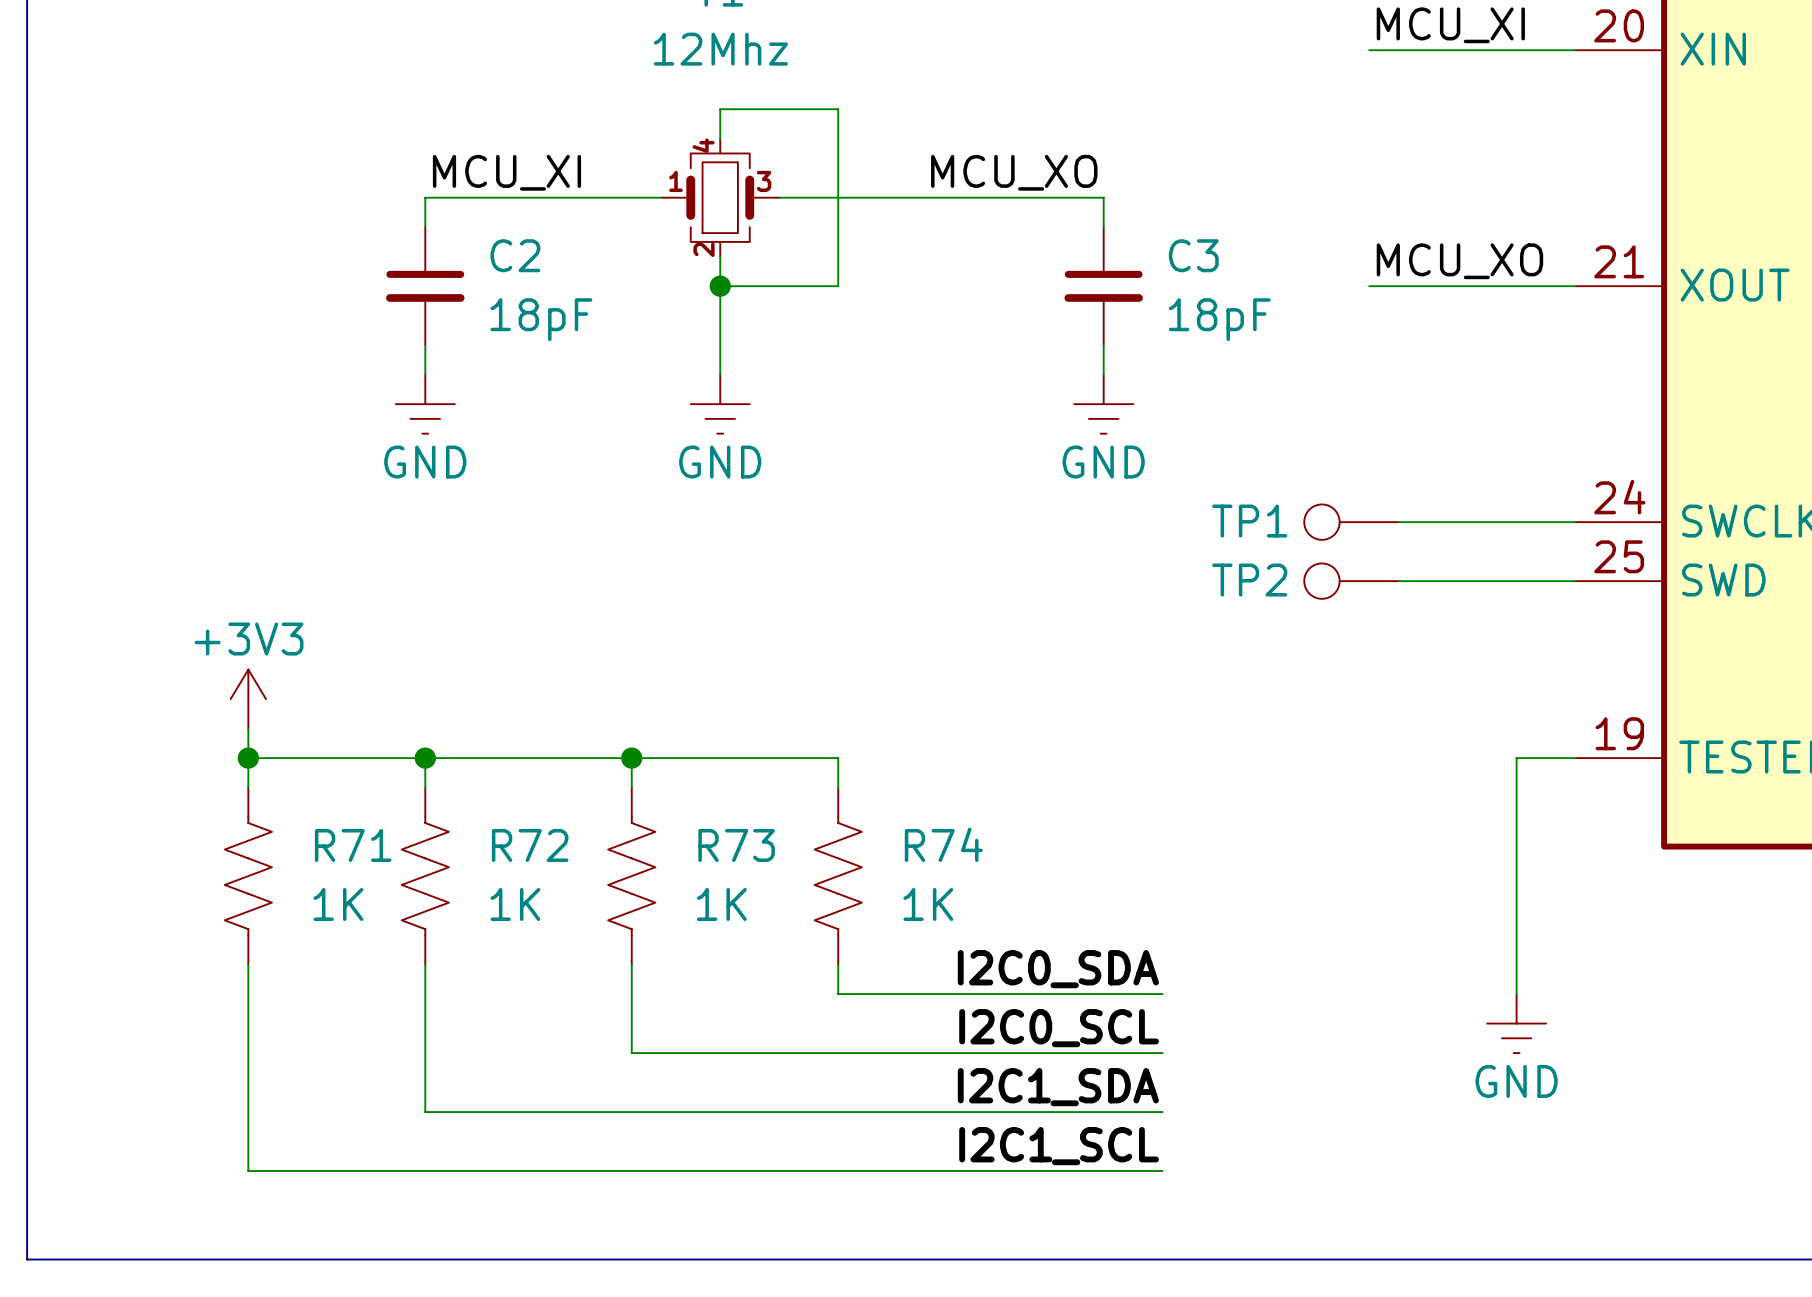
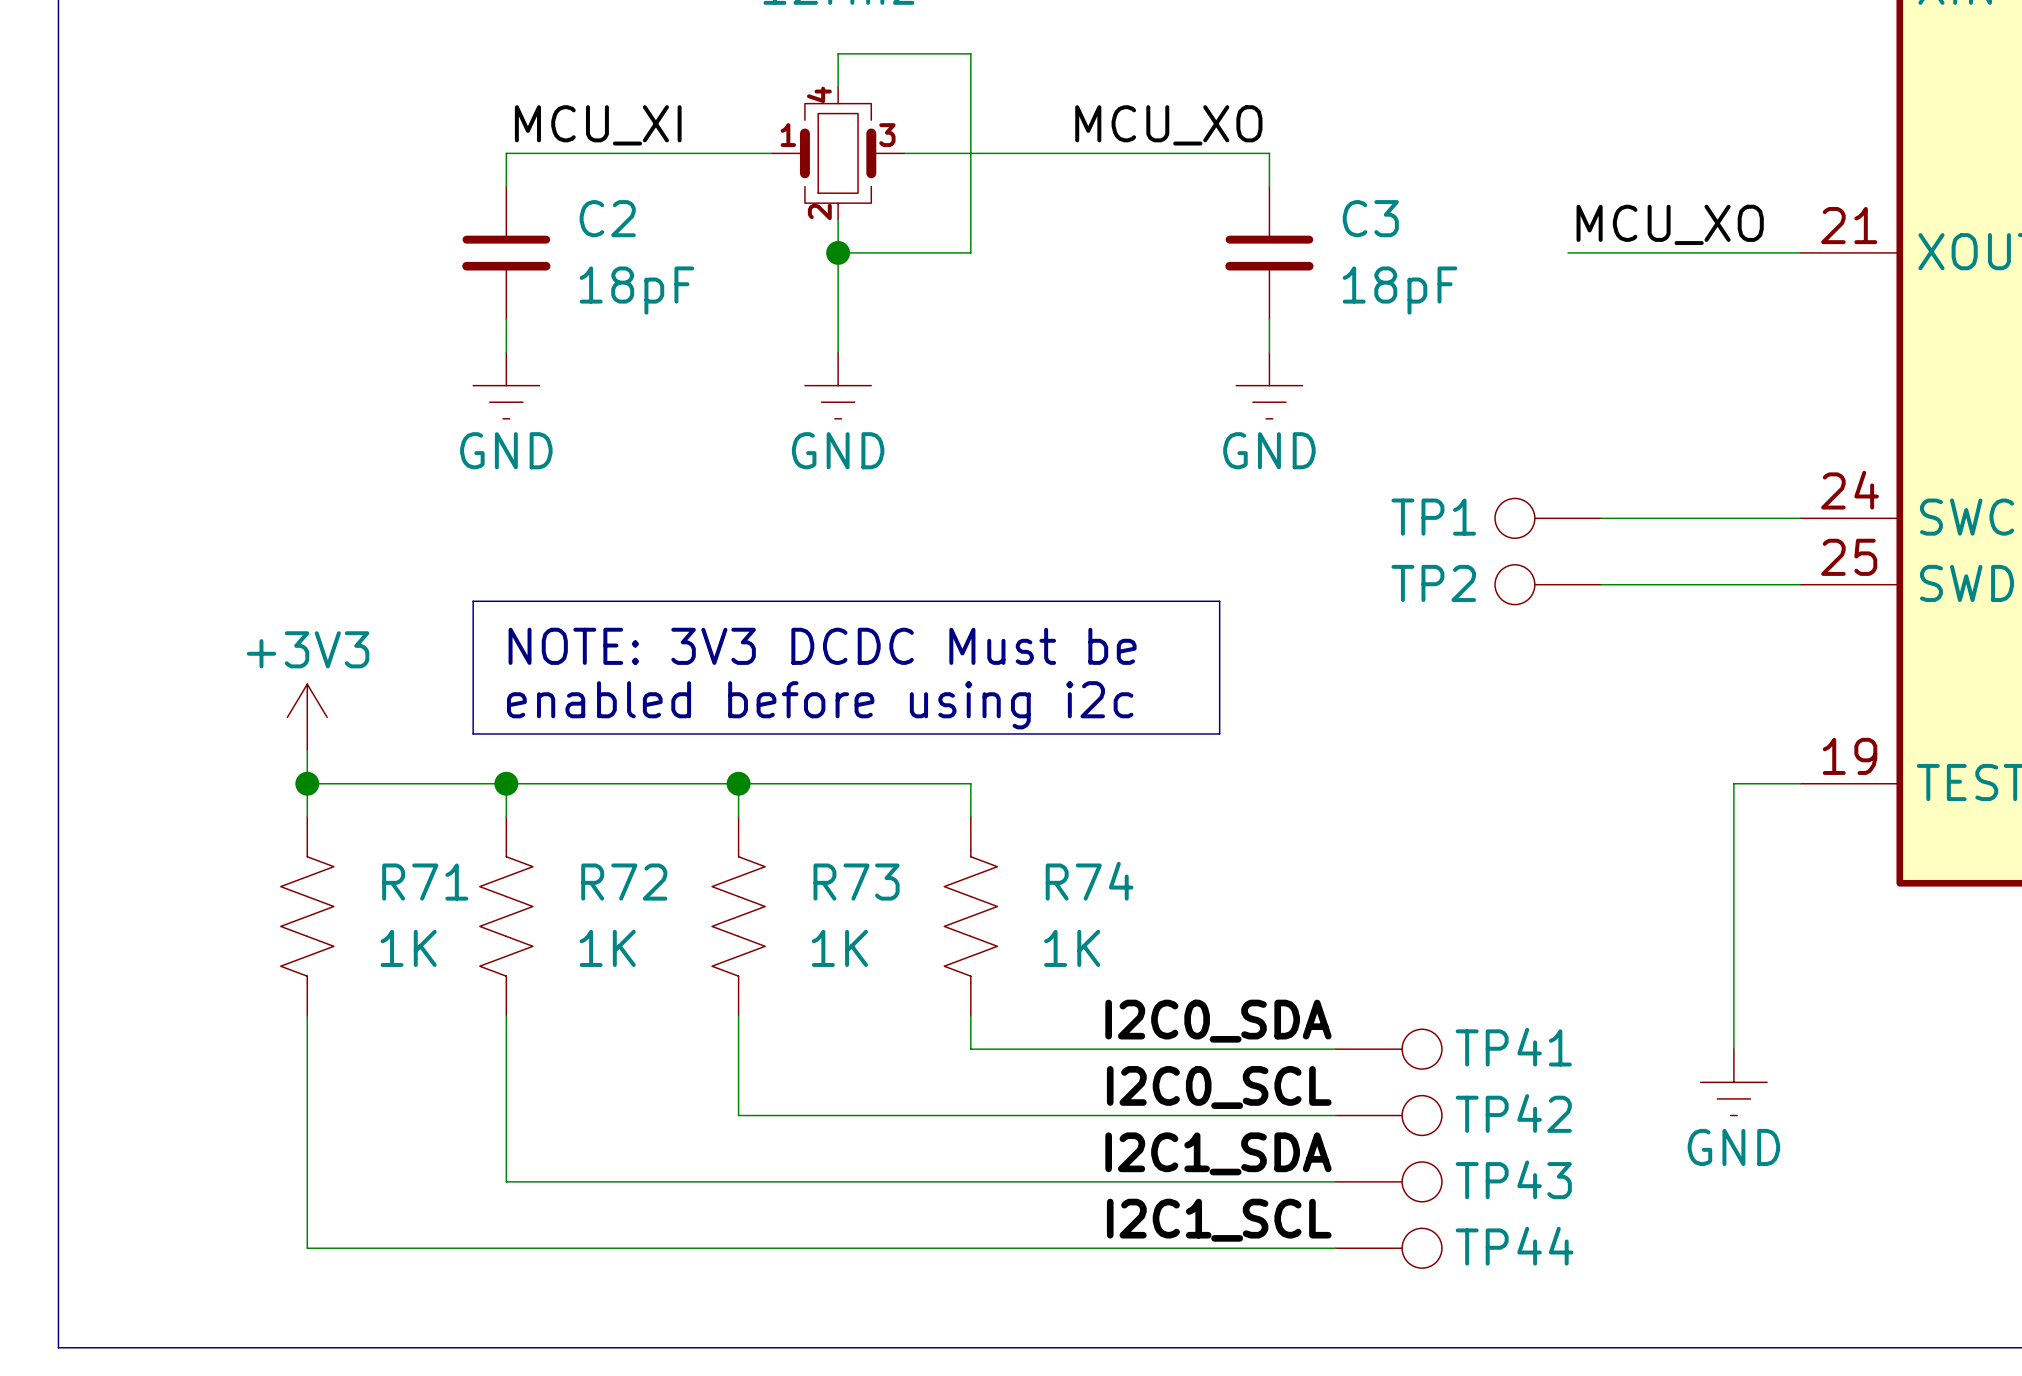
line: none -> (473, 601) (1219, 601) (1219, 733) (473, 733) (473, 601)
text: none -> NOTE: 3V3 DCDC Must be (822, 646)
text: none -> enabled before using i2c (820, 705)
TP41: none -> (1388, 1049)
TP42: none -> (1388, 1115)
TP43: none -> (1388, 1181)
TP44: none -> (1388, 1248)

